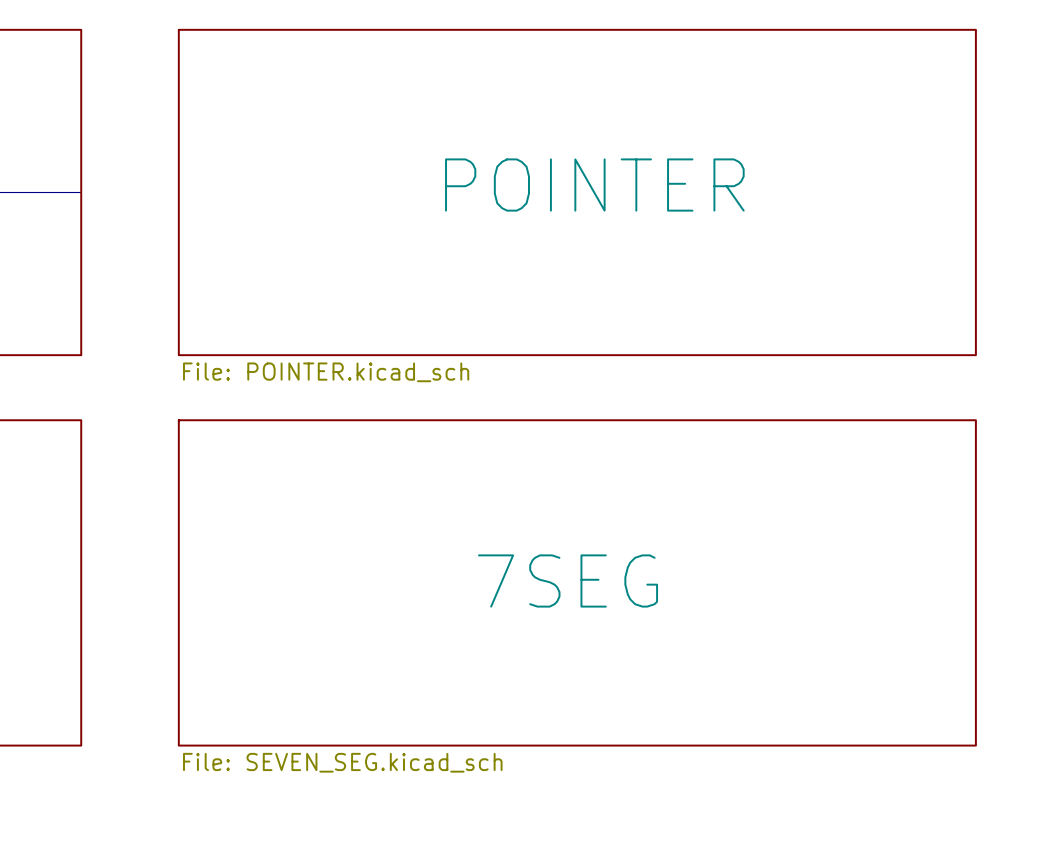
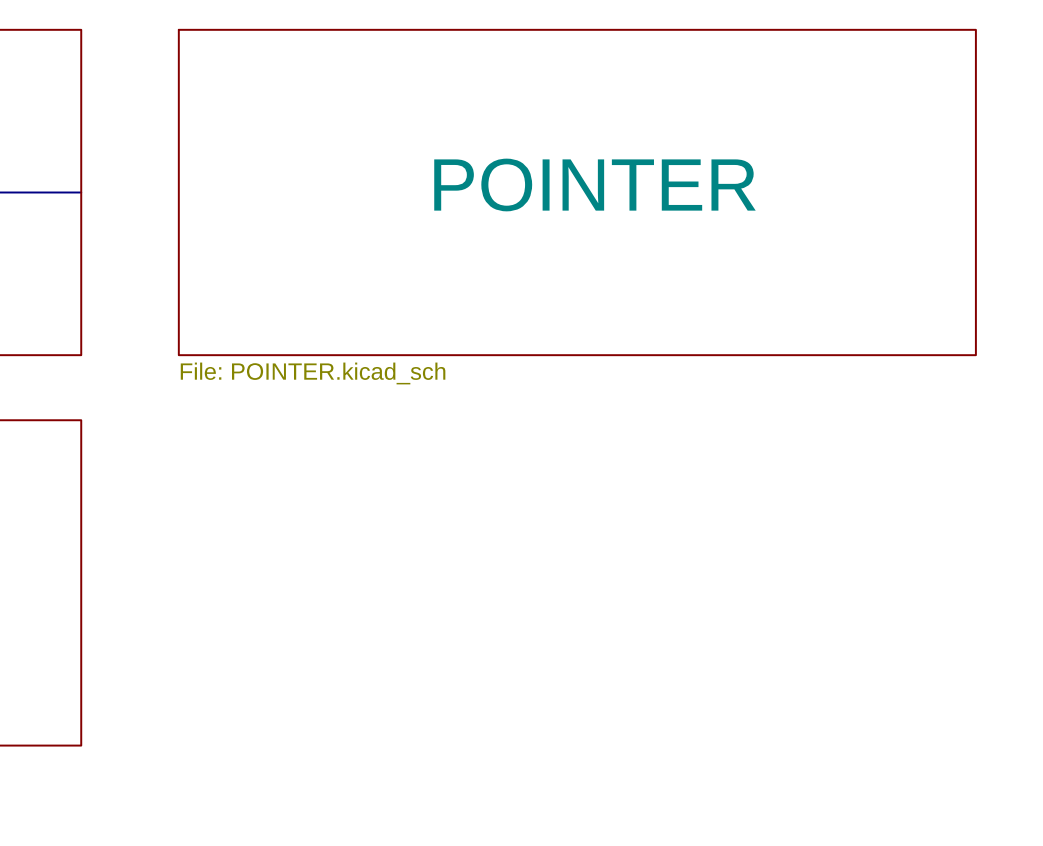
sheet 7SEG: File: SEVEN_SEG.kicad_sch (577, 582) -> none

